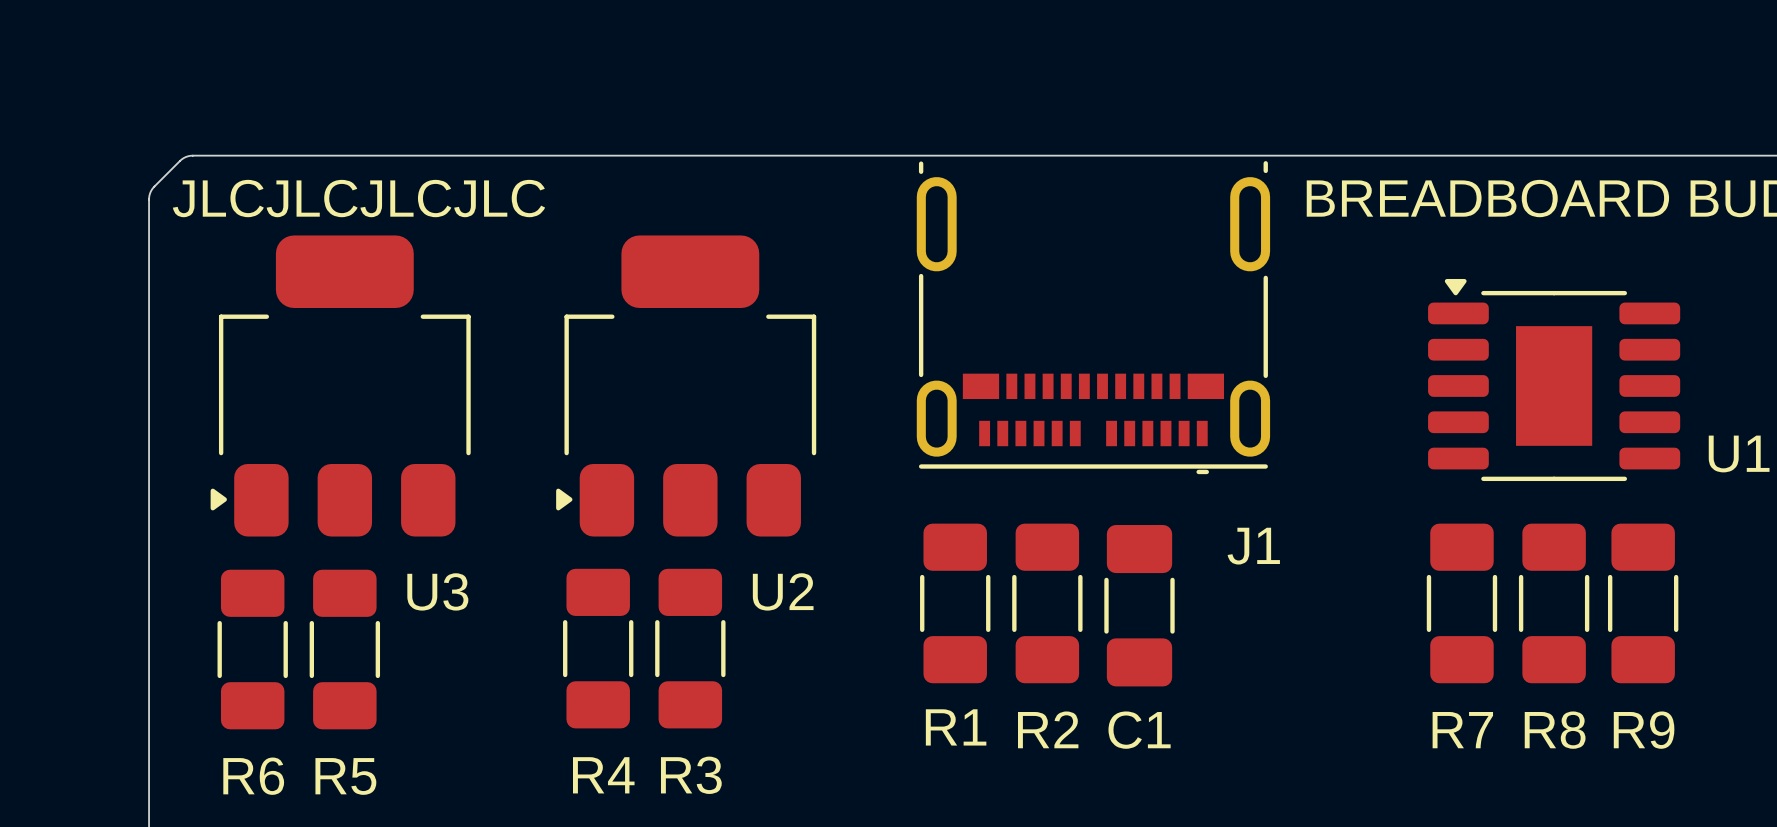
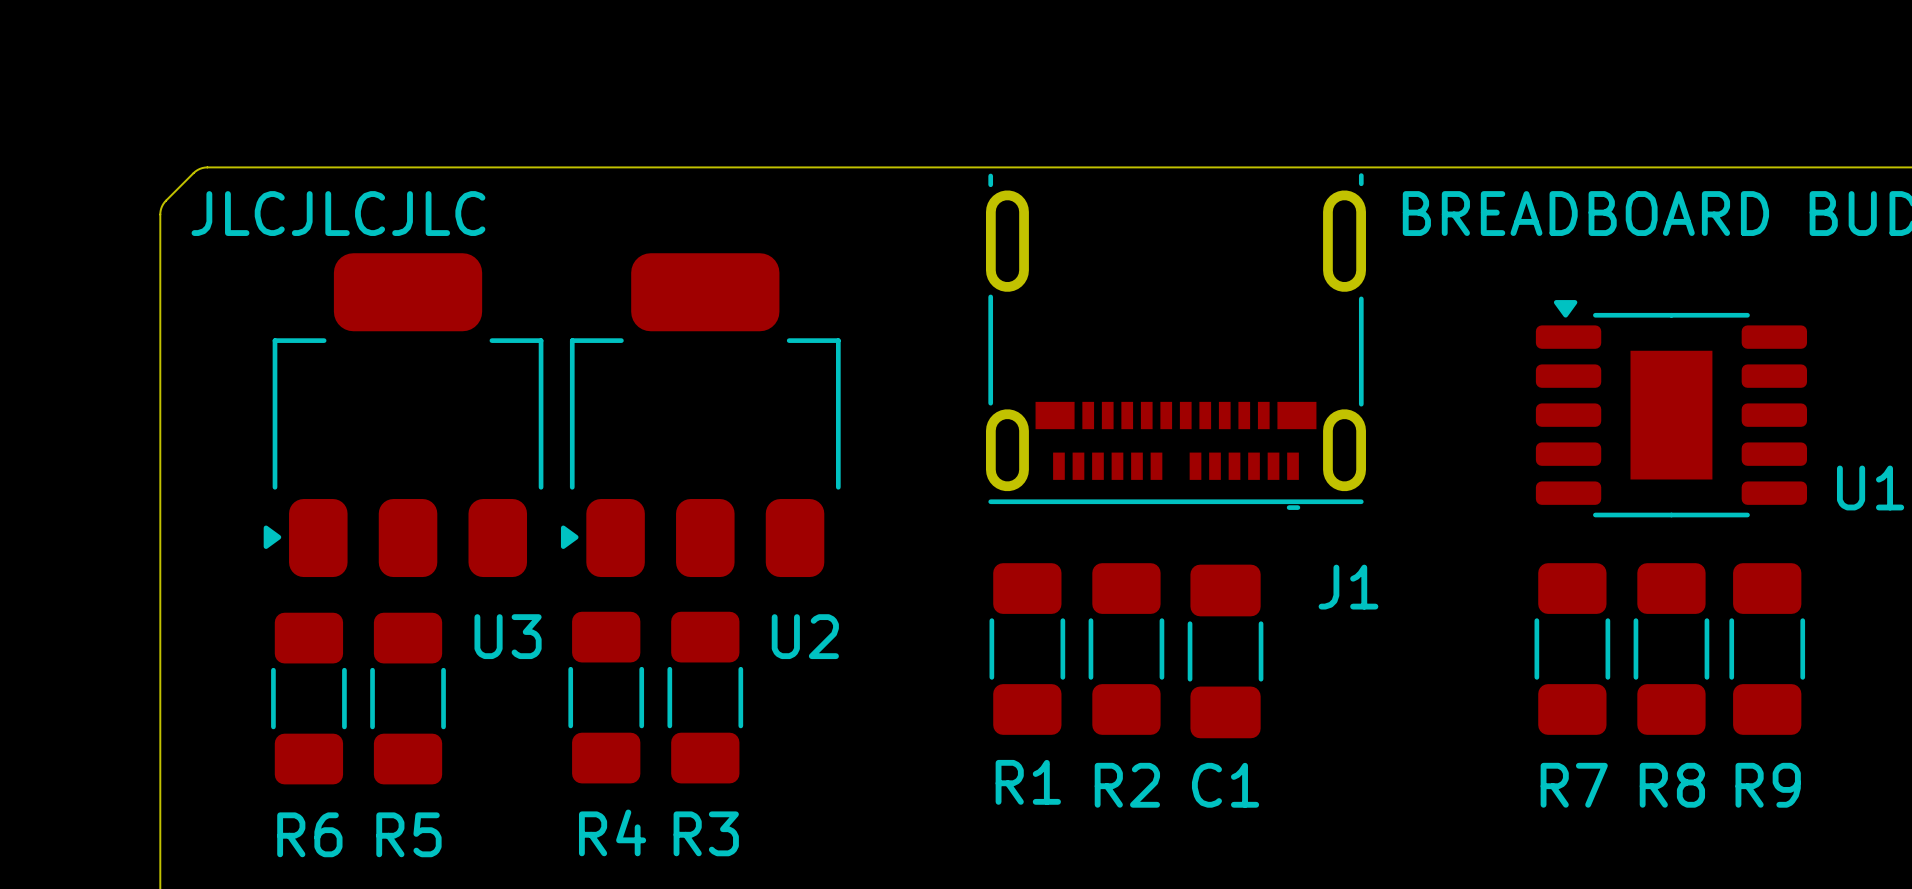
text: JLCJLCJLCJLC (359, 198) -> JLCJLCJLC (338, 213)
U3 position: (340, 385) -> (403, 415)
U2 position: (686, 385) -> (700, 415)
R4 position: (598, 648) -> (606, 697)
R3 position: (690, 648) -> (705, 697)
R6 position: (252, 649) -> (308, 698)
R5 position: (344, 649) -> (408, 698)

